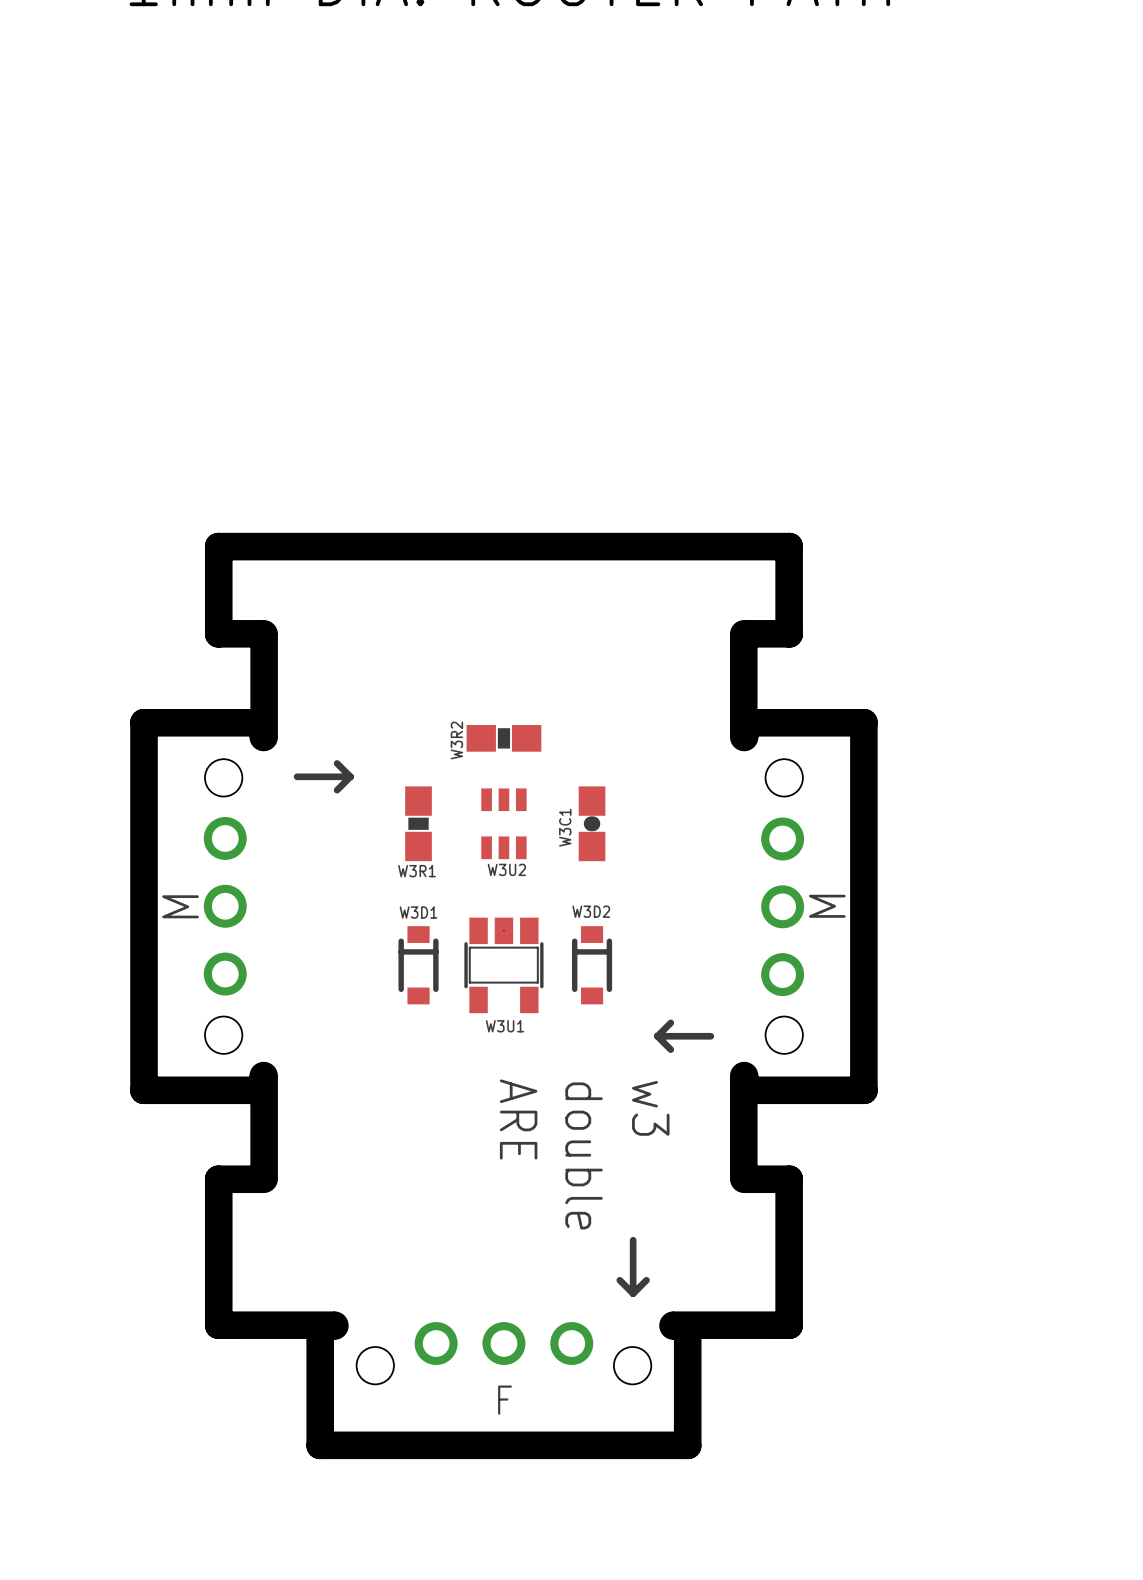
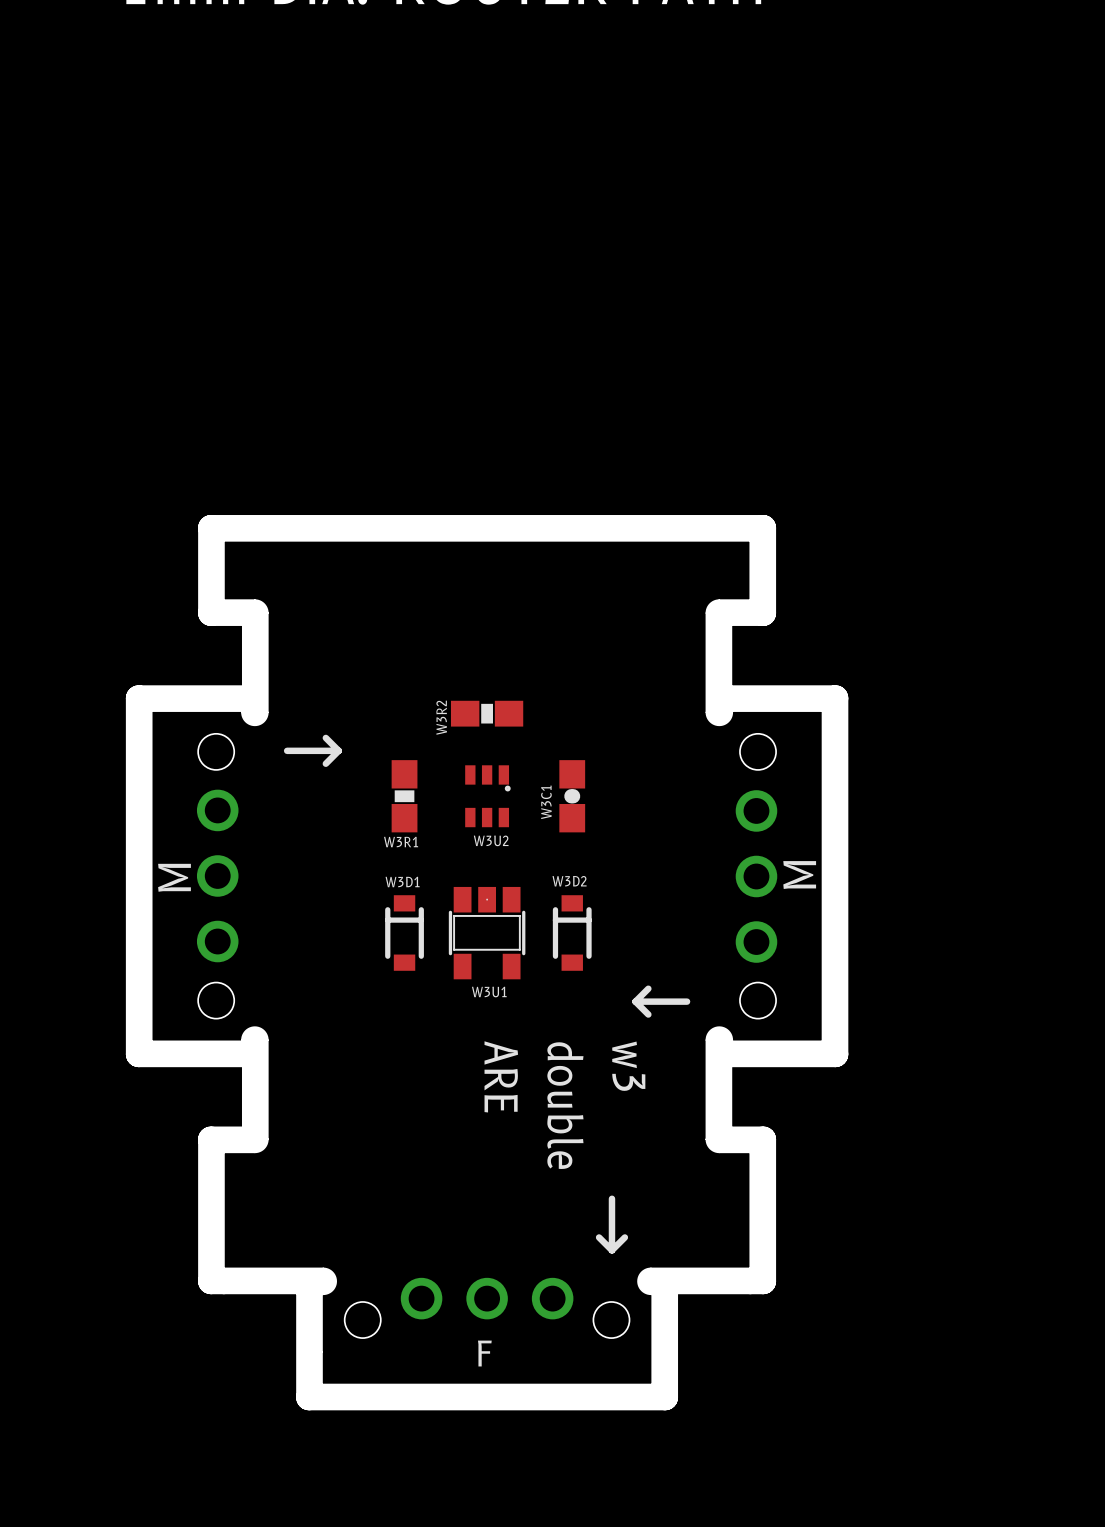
W3U2 footprint: [481, 788, 527, 860] -> [465, 765, 511, 828]

